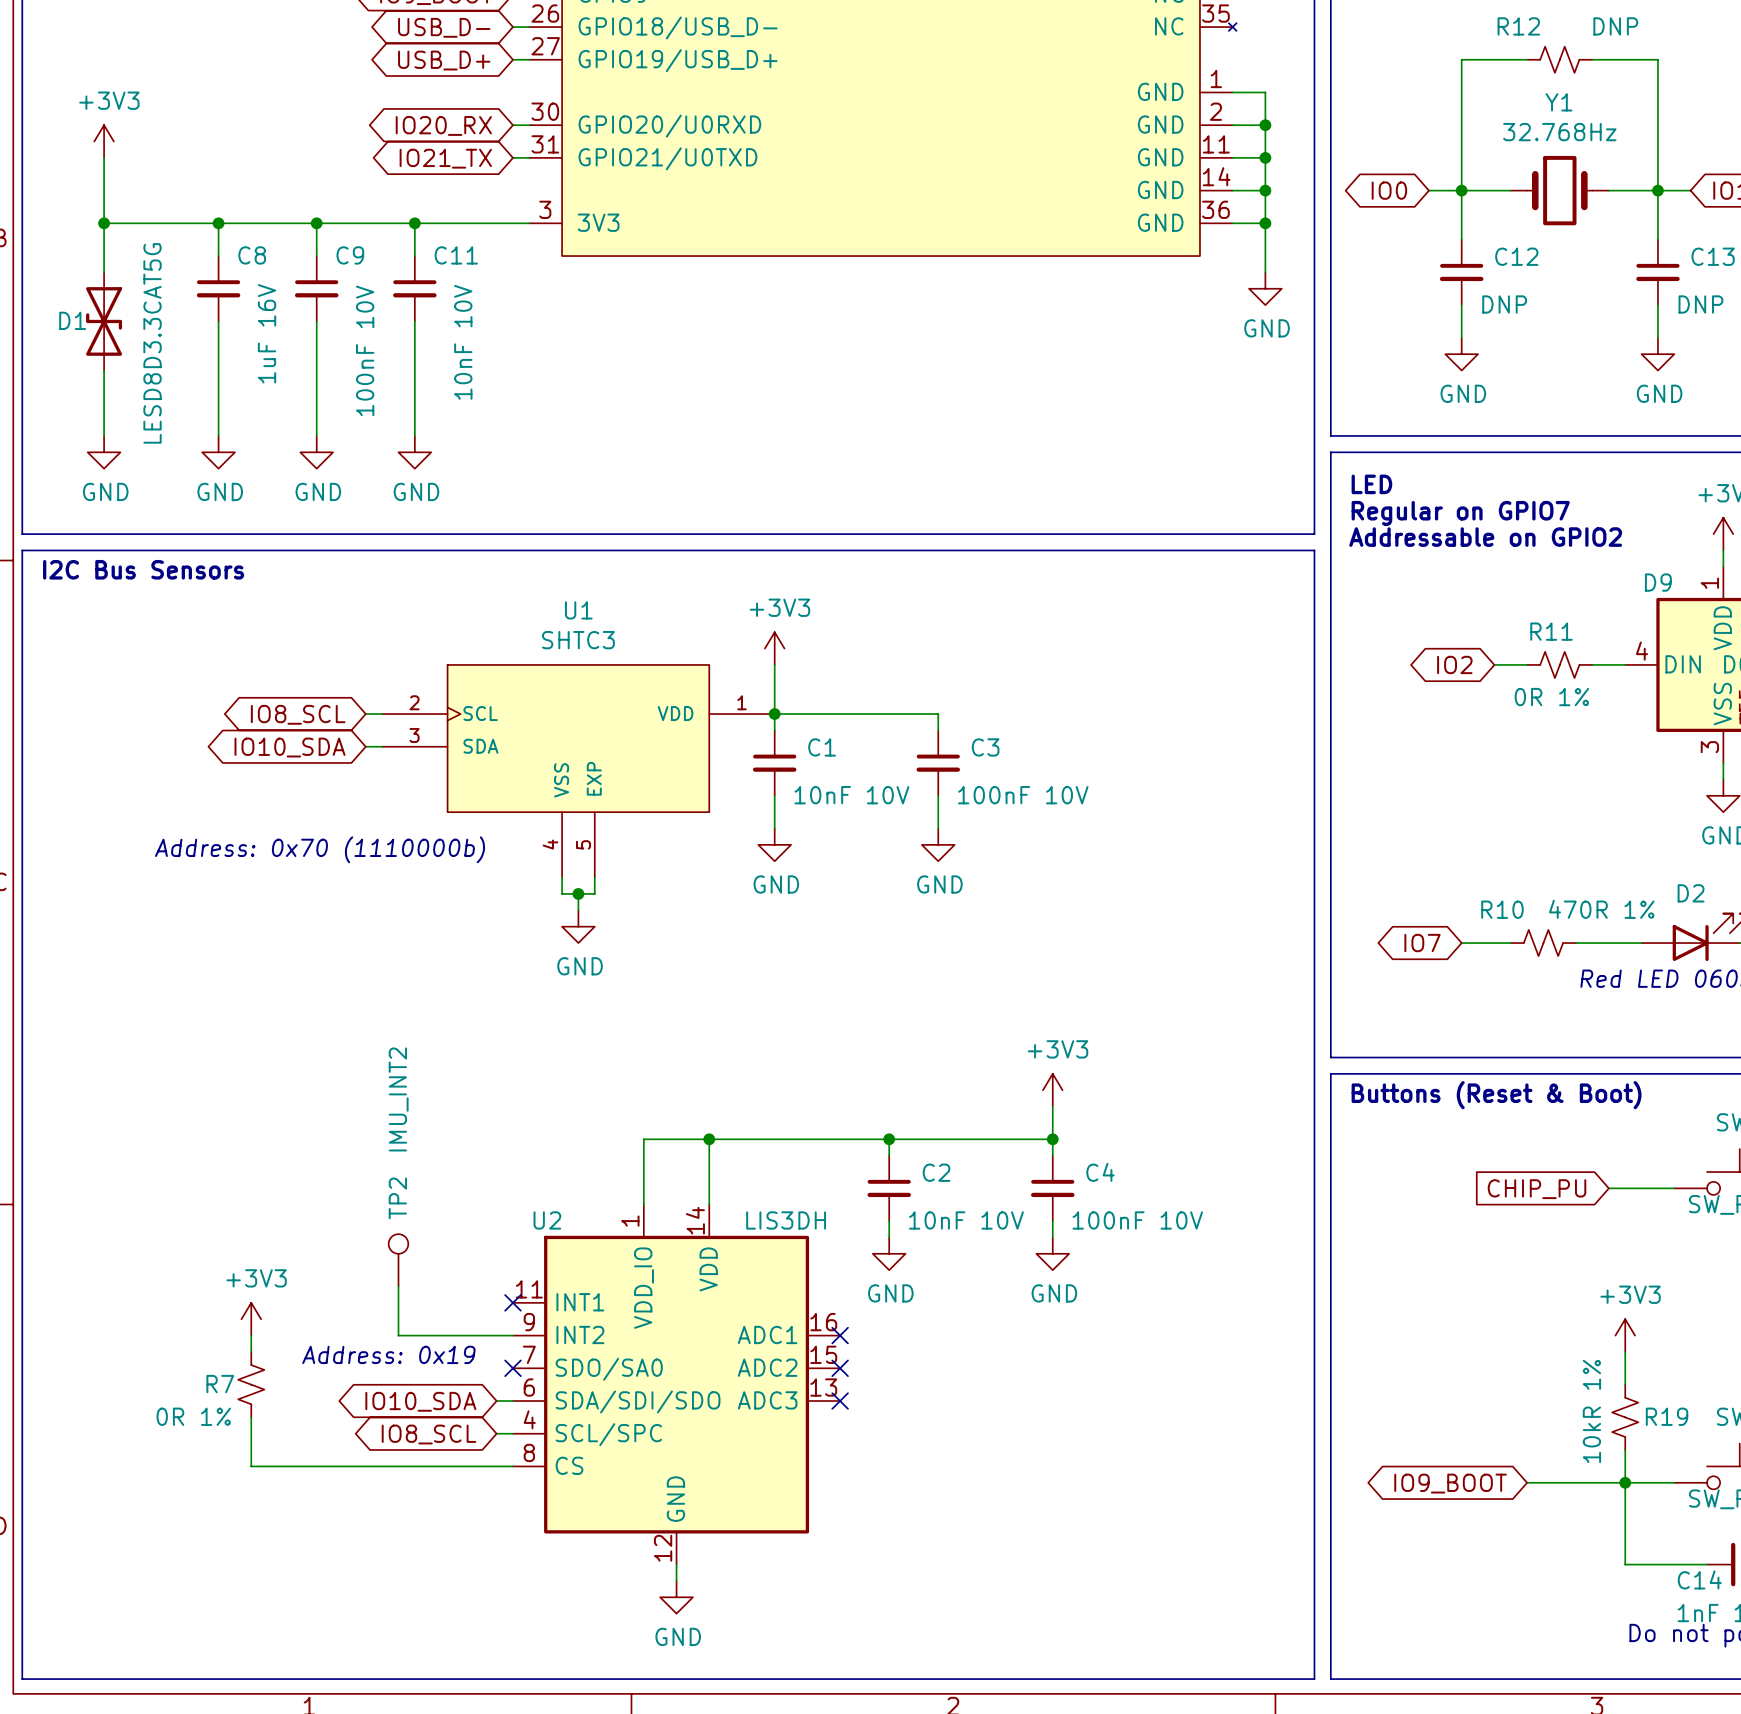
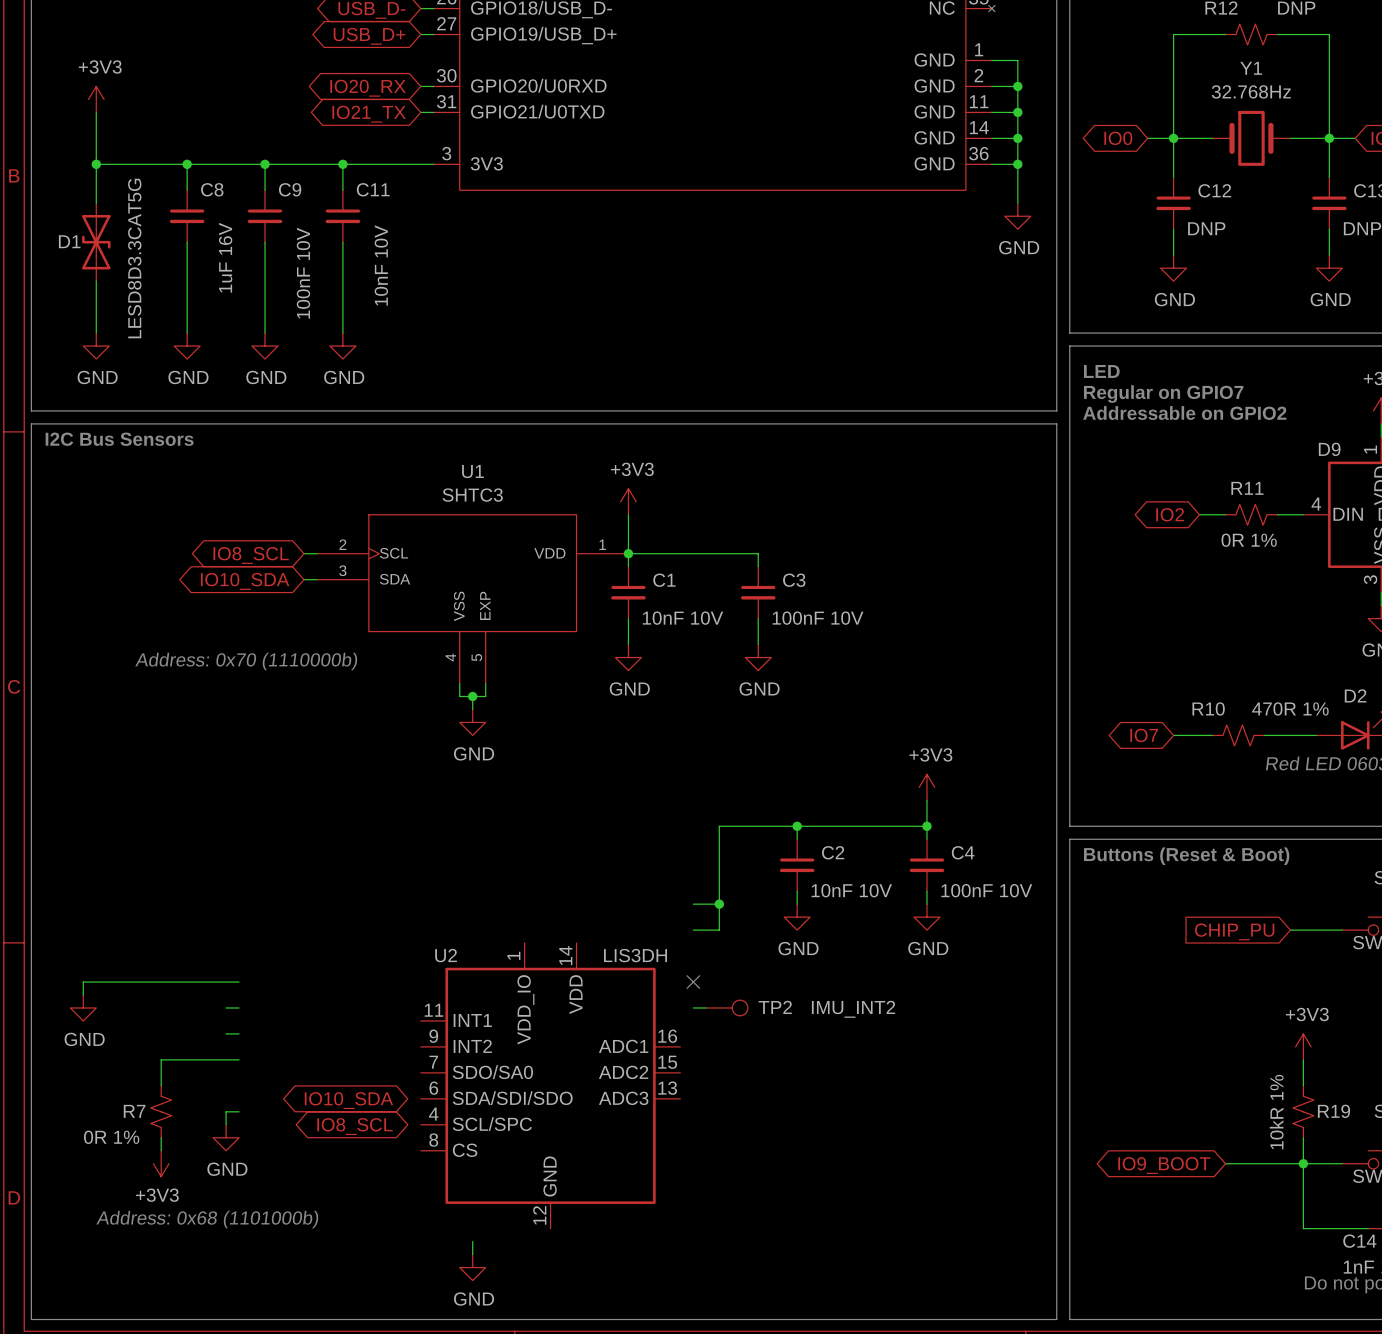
wire: none -> (797, 826) (797, 839)
junction: none -> (797, 826)
wire: none -> (926, 826) (719, 826) (719, 891)
junction: none -> (926, 826)
power symbol position: +3V3 (1052, 1090) -> +3V3 (926, 787)
wire: (1052, 1106) (1052, 1155) -> (926, 800) (926, 839)
wire: (709, 1139) (709, 1204) -> none
junction: (709, 1139) -> none
junction position: (889, 1139) -> (719, 904)
wire: (1052, 1139) (643, 1139) (643, 1204) -> none
junction: (1052, 1139) -> none
wire: none -> (693, 904) (719, 904) (719, 930) (693, 930)
power symbol: none -> GND (797, 917)
power symbol: none -> GND (926, 917)
C2 position: (889, 1188) -> (797, 865)
C4 position: (1052, 1188) -> (926, 865)
wire: (889, 1221) (889, 1237) -> (797, 891) (797, 904)
wire: (1052, 1221) (1052, 1237) -> (926, 891) (926, 904)
TP2 rotation: 0° (398, 1243) -> 90° clockwise (740, 1007)
wire: none -> (239, 982) (83, 982) (83, 995)
no-connect mark: none -> (693, 982)
power symbol: GND (889, 1253) -> none
power symbol: GND (1052, 1253) -> none
TP2 position: (398, 1260) -> (727, 1007)
power symbol: none -> GND (83, 1007)
wire: (398, 1286) (398, 1335) (512, 1335) -> none
wire: none -> (693, 1007) (706, 1007)
no-connect mark: (512, 1302) -> none
power symbol rotation: 0° (251, 1319) -> 180° (161, 1163)
power symbol position: +3V3 (251, 1319) -> +3V3 (161, 1163)
wire: (251, 1335) (251, 1351) -> (161, 1137) (161, 1150)
no-connect mark: (840, 1335) -> none
wire: none -> (239, 1059) (161, 1059) (161, 1085)
text: Address: 0x19 (388, 1354) -> none
no-connect mark: (512, 1368) -> none
no-connect mark: (840, 1368) -> none
R7 position: (251, 1384) -> (161, 1111)
wire: (496, 1401) (512, 1401) -> (226, 1007) (239, 1007)
no-connect mark: (840, 1401) -> none
wire: (251, 1417) (251, 1466) (512, 1466) -> none
wire: none -> (239, 1111) (226, 1111) (226, 1124)
wire: (496, 1433) (512, 1433) -> (226, 1033) (239, 1033)
power symbol: none -> GND (226, 1137)
text: none -> Address: 0x68 (1101000b) (207, 1219)
wire: (676, 1564) (676, 1580) -> (472, 1241) (472, 1254)
power symbol position: GND (676, 1597) -> GND (472, 1267)

